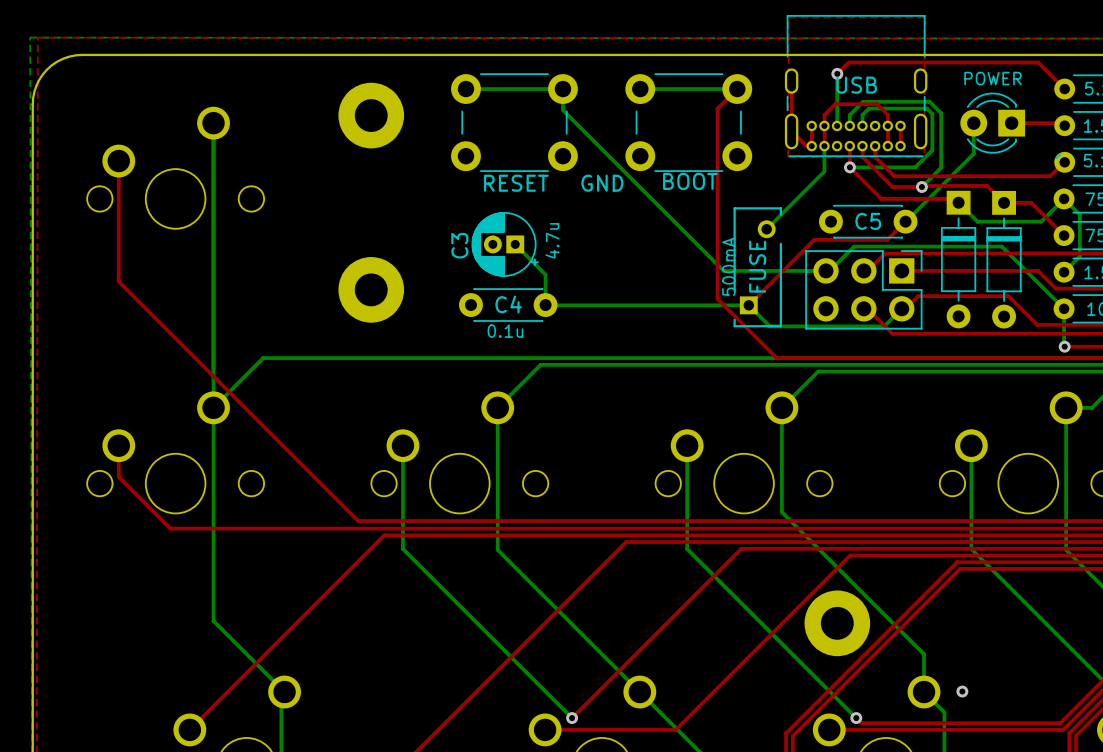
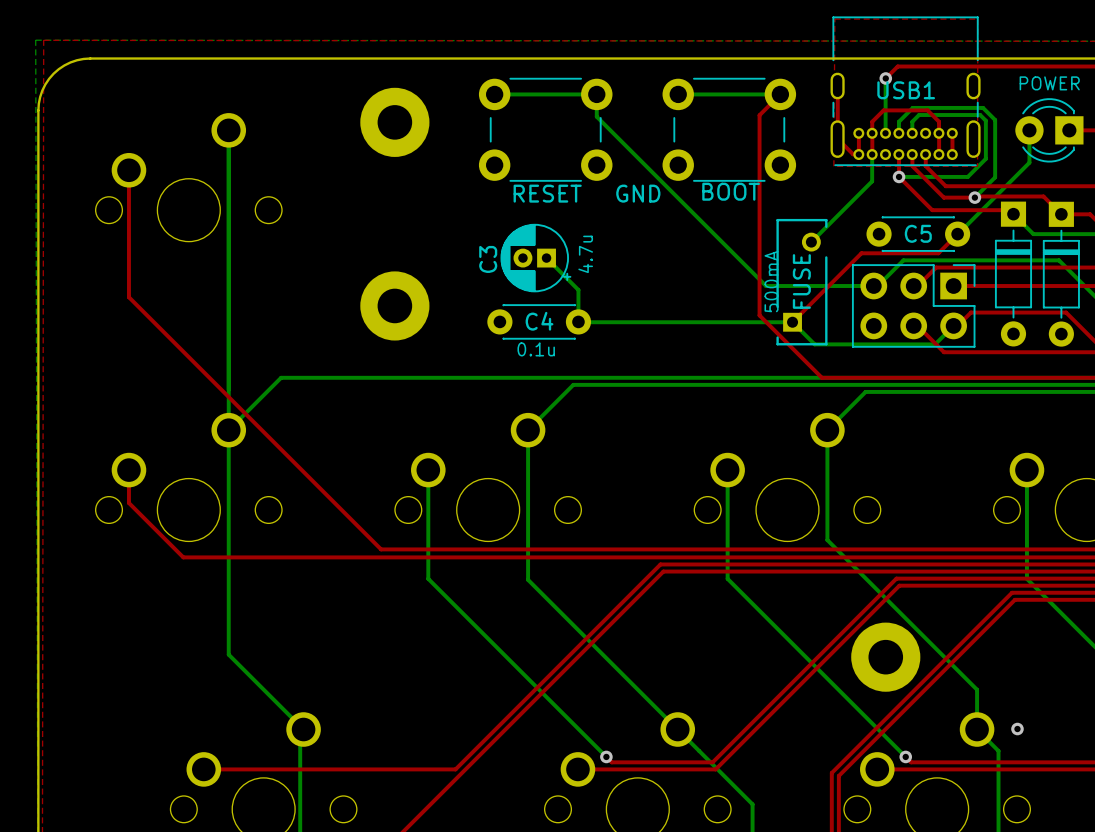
USB name: USB (856, 85) -> USB1 (906, 90)
top track: (623, 535) (384, 535) (189, 729) -> (660, 564) (455, 769) (203, 769)
top track: (847, 548) (741, 548) (572, 718) -> (896, 578) (712, 762) (611, 762) (606, 756)

